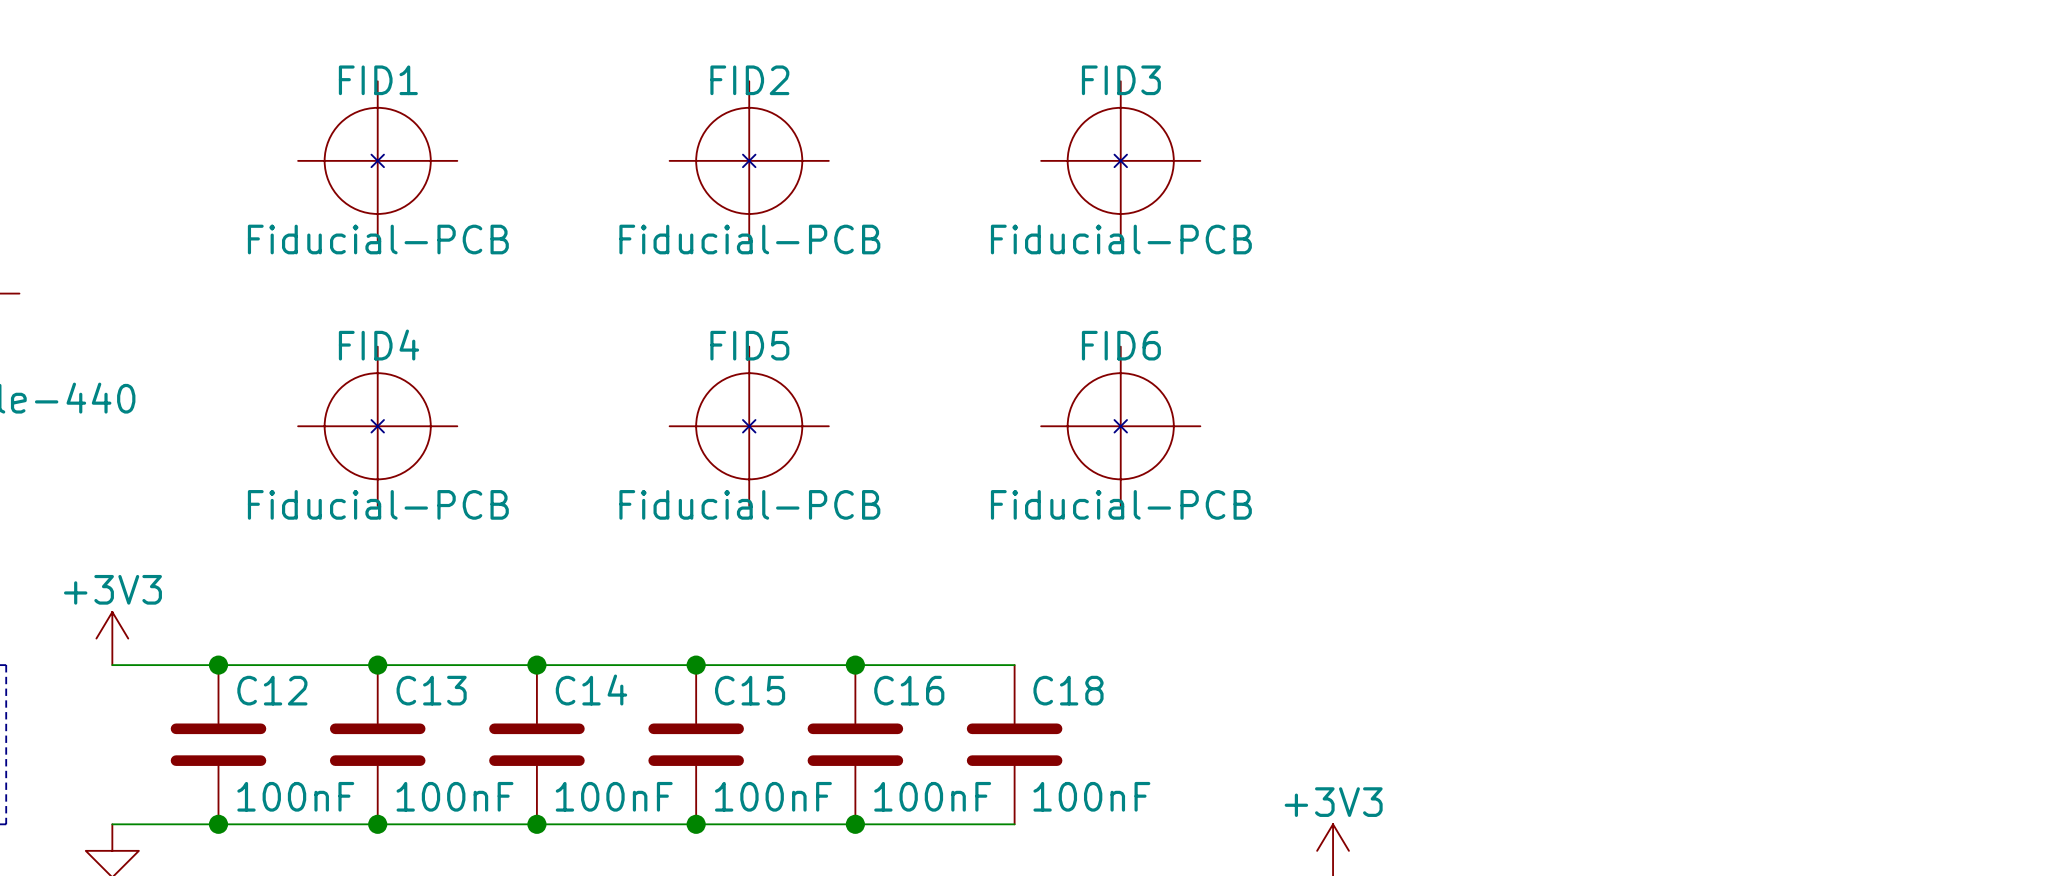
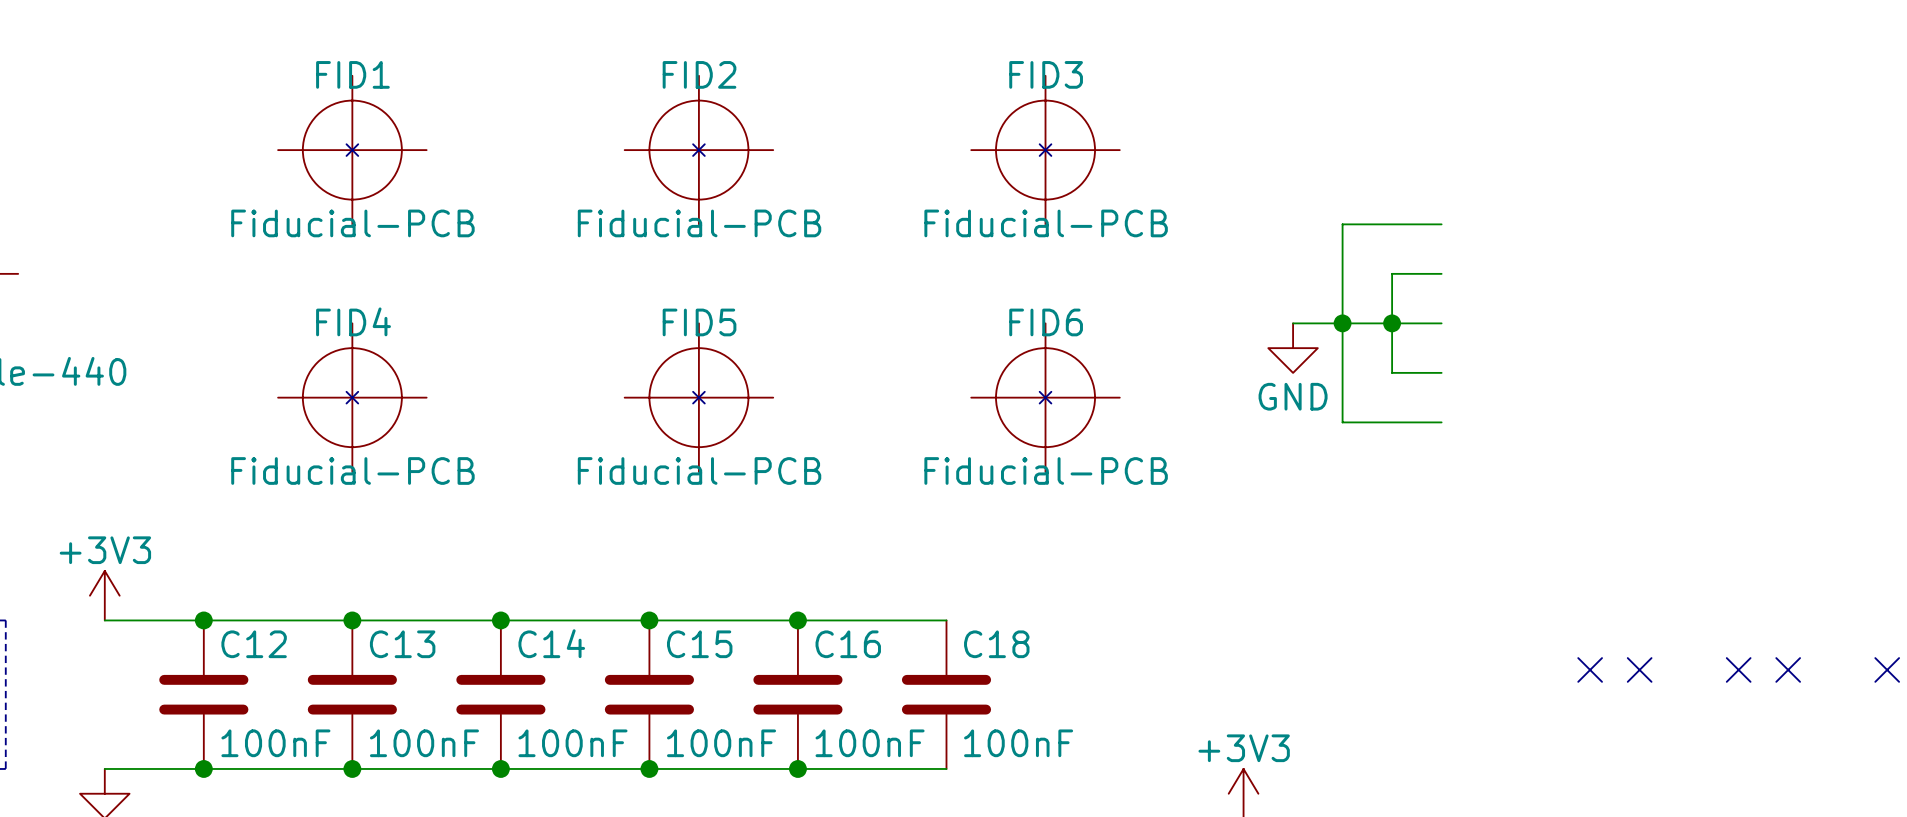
wire: none -> (1441, 224) (1342, 224) (1342, 422) (1441, 422)
wire: none -> (1441, 273) (1392, 273) (1392, 372) (1441, 372)
wire: none -> (1293, 323) (1441, 323)
junction: none -> (1342, 323)
junction: none -> (1392, 323)
power symbol: none -> GND (1293, 348)
no-connect mark: none -> (1590, 669)
no-connect mark: none -> (1639, 669)
no-connect mark: none -> (1738, 669)
no-connect mark: none -> (1788, 669)
no-connect mark: none -> (1887, 669)

